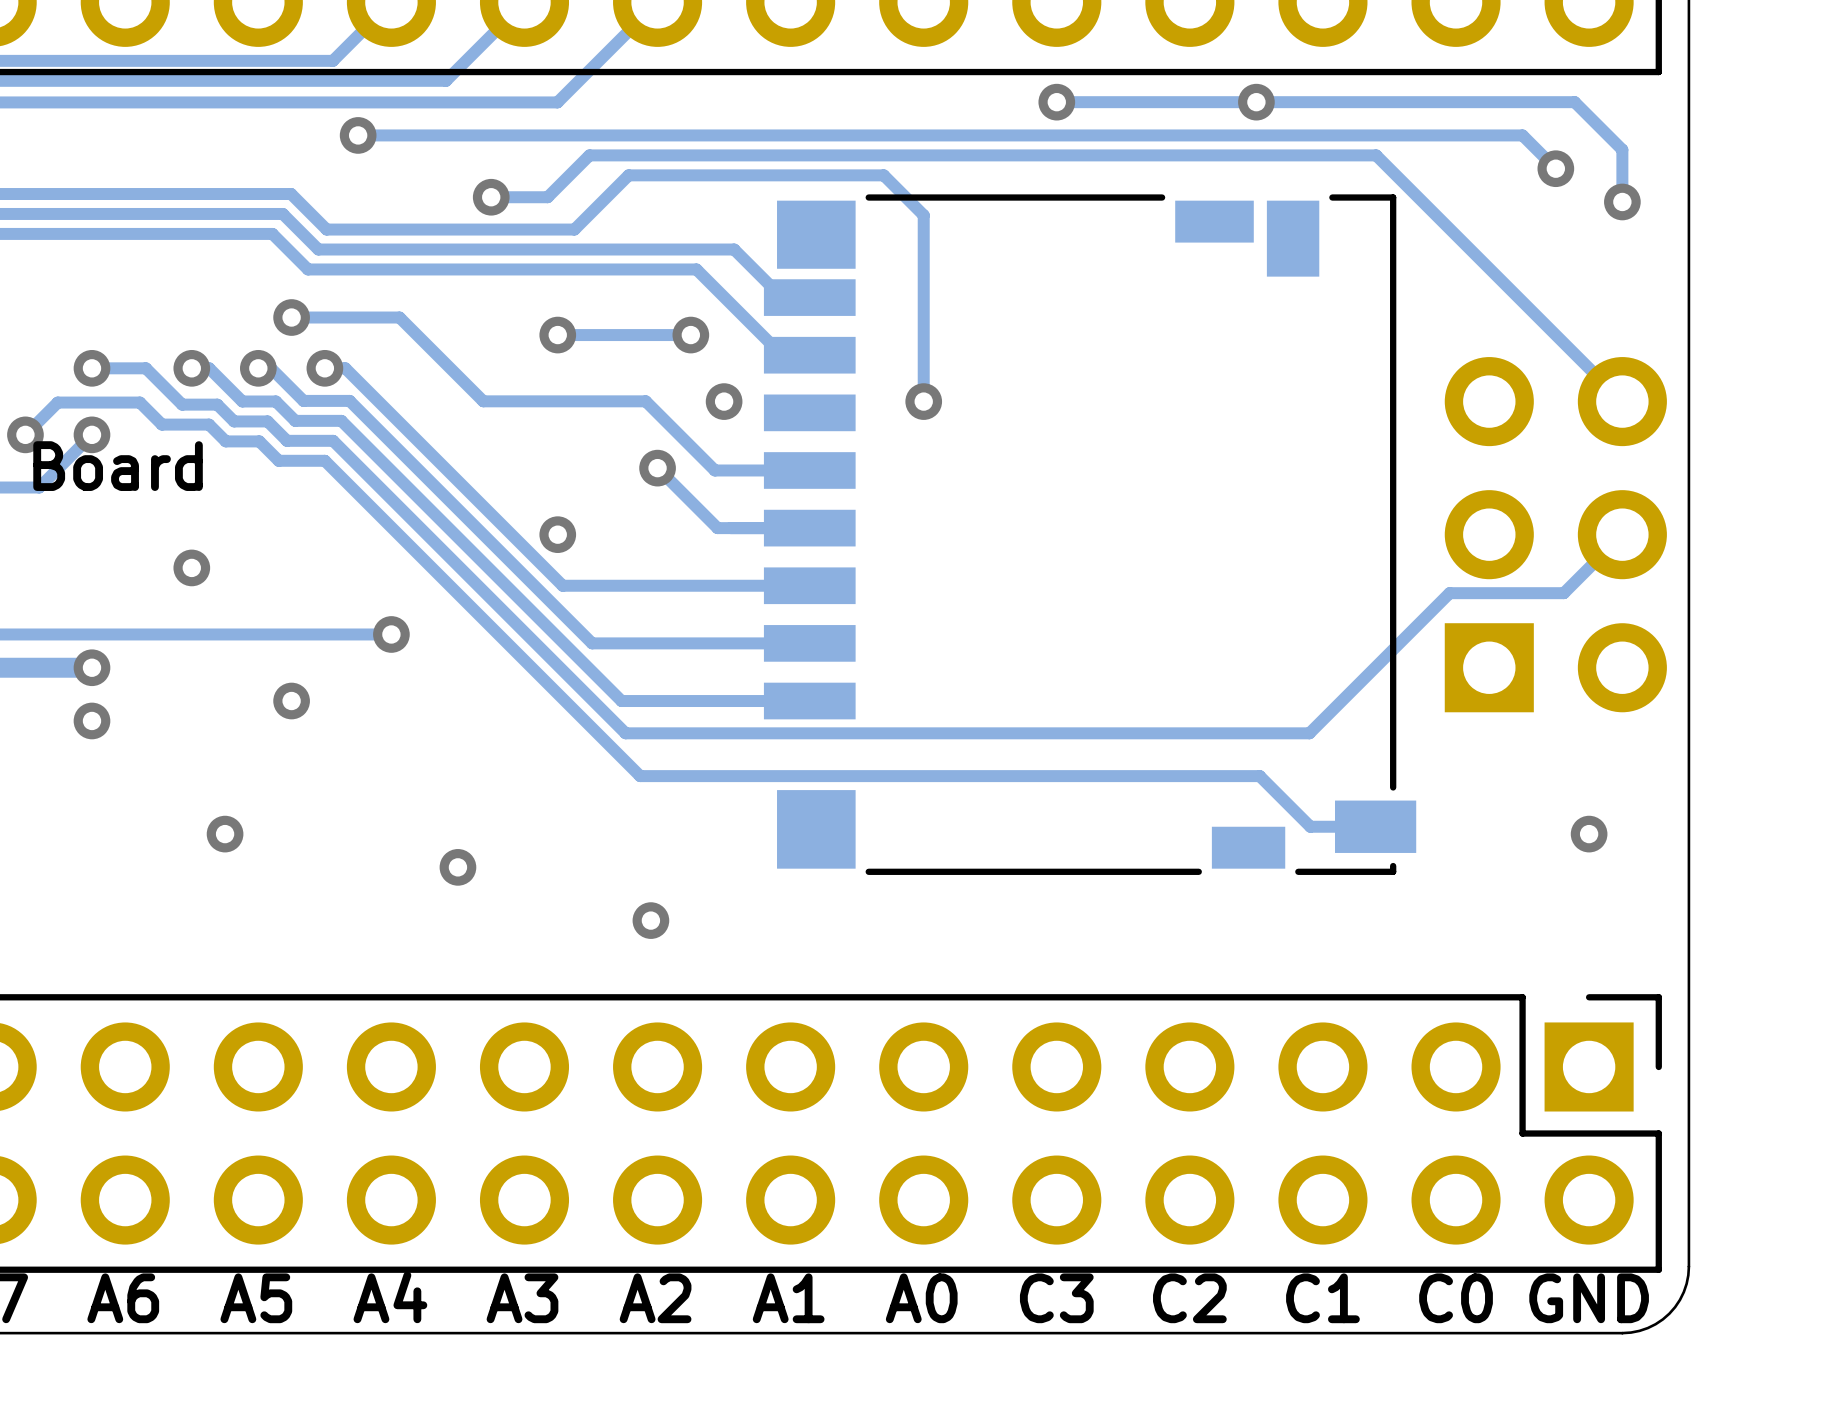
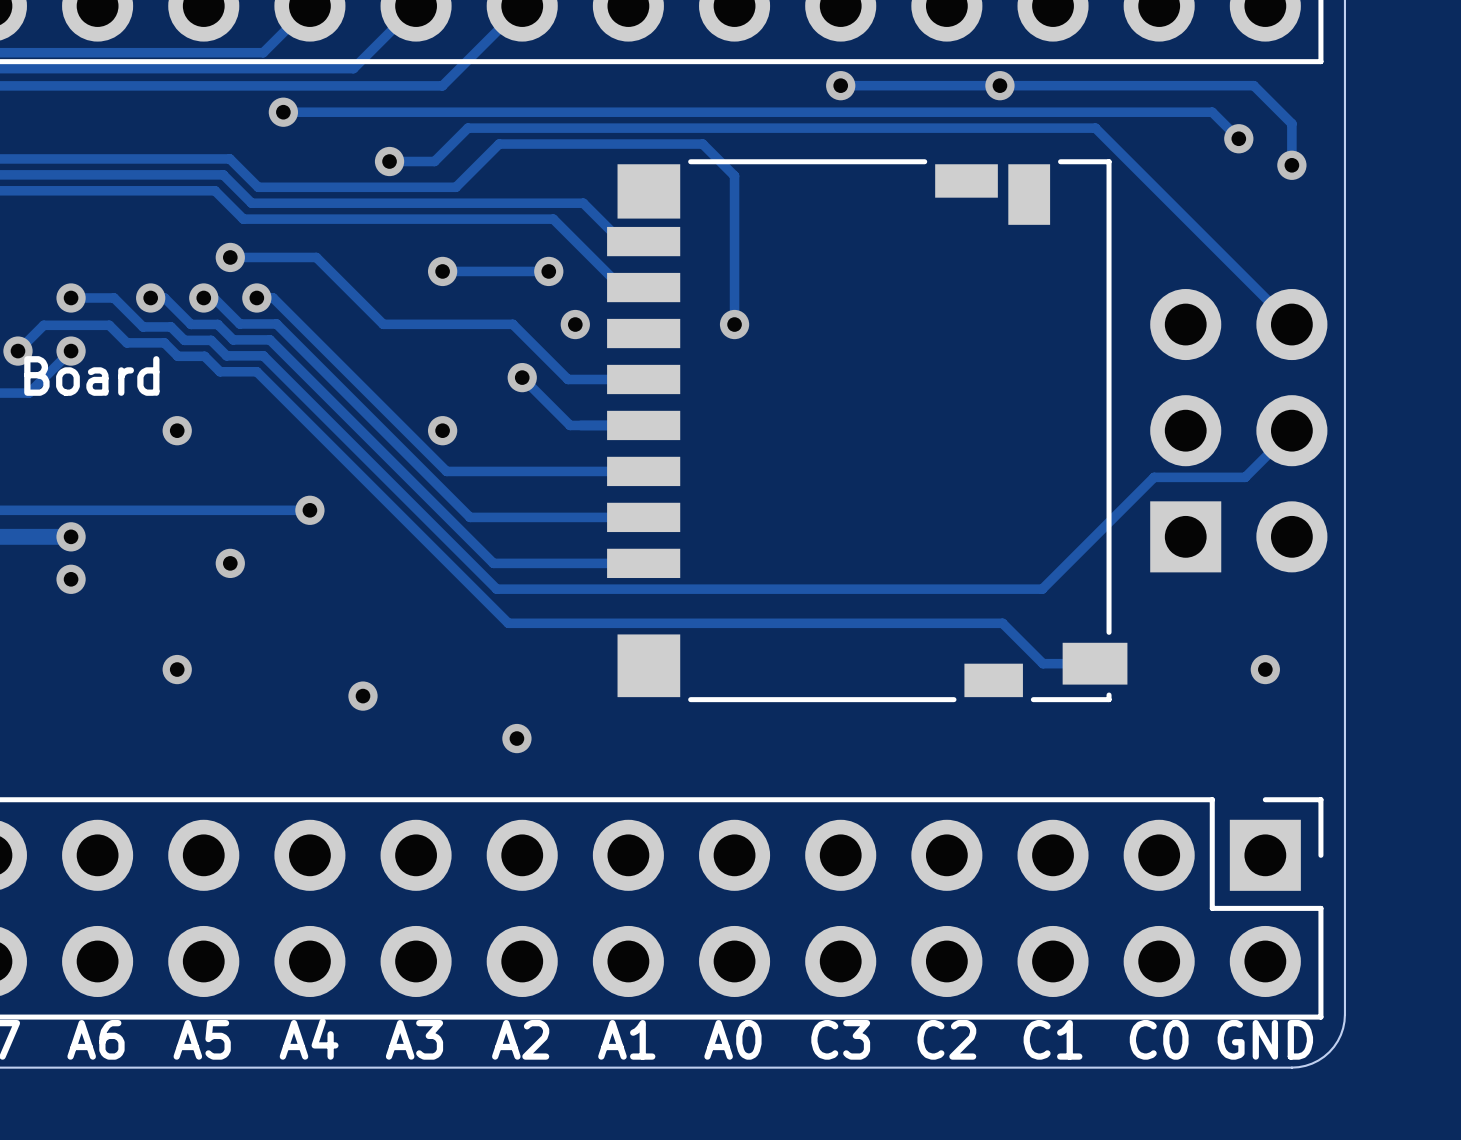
via position: (191, 567) -> (177, 430)

